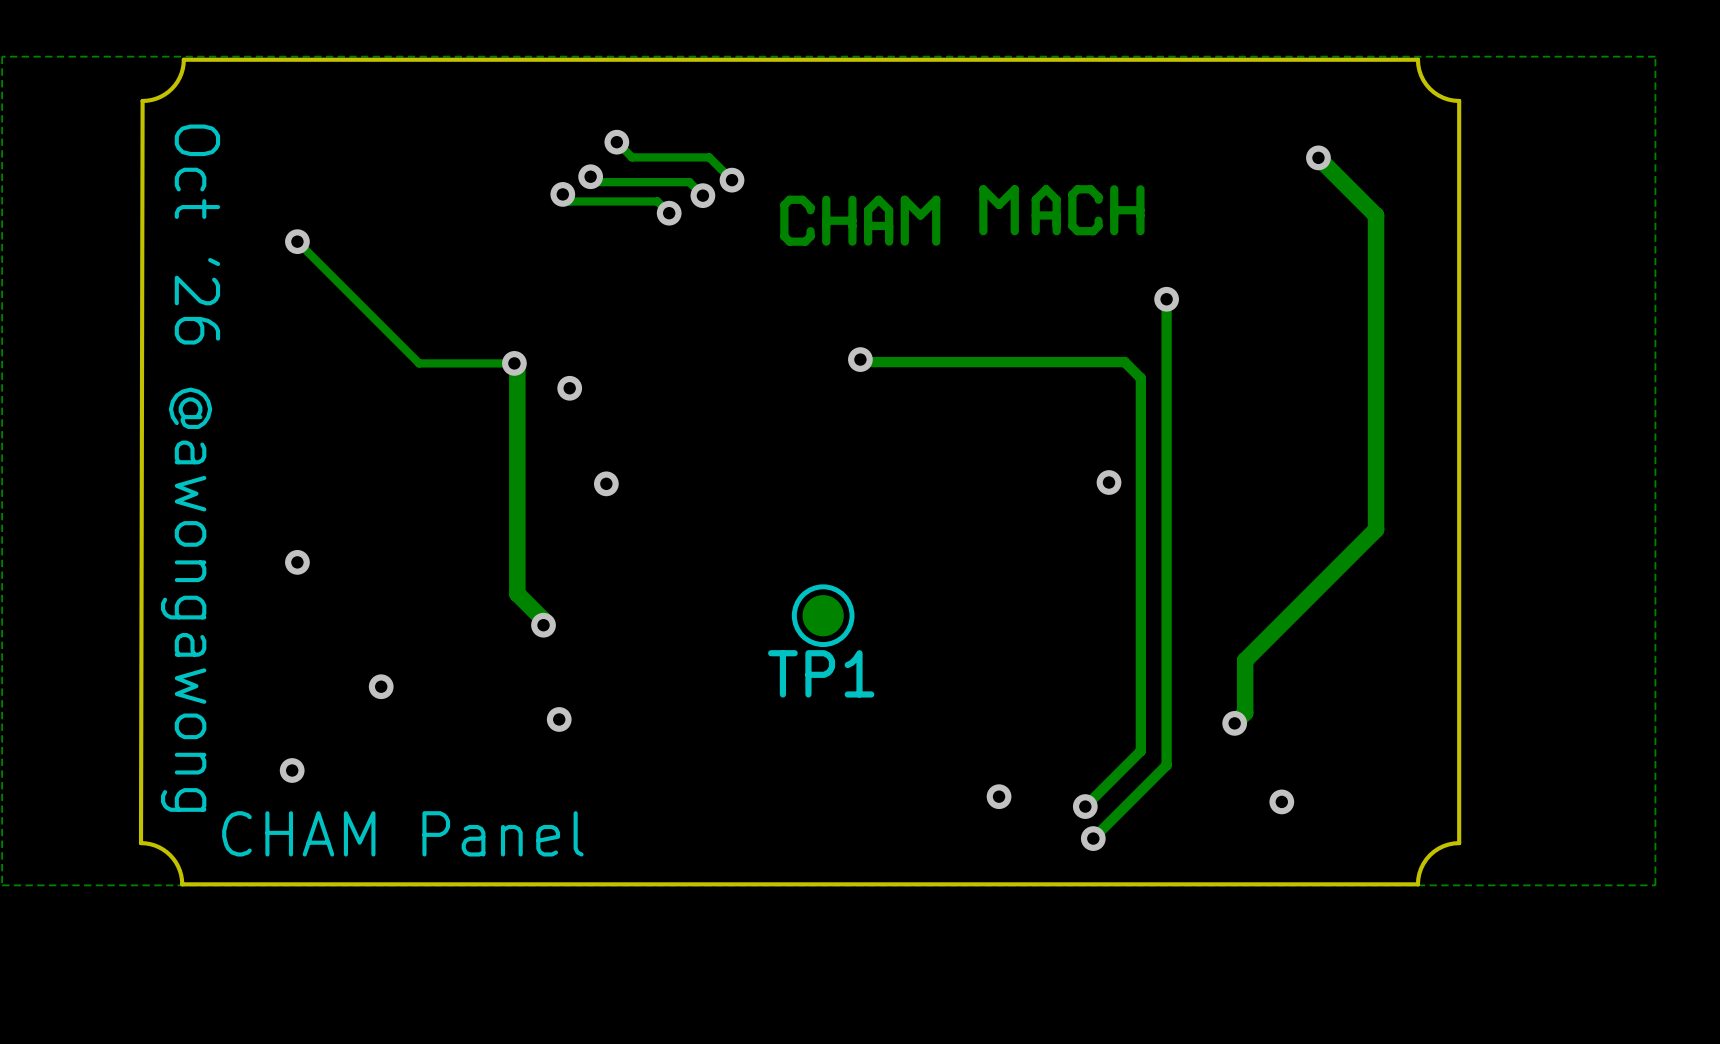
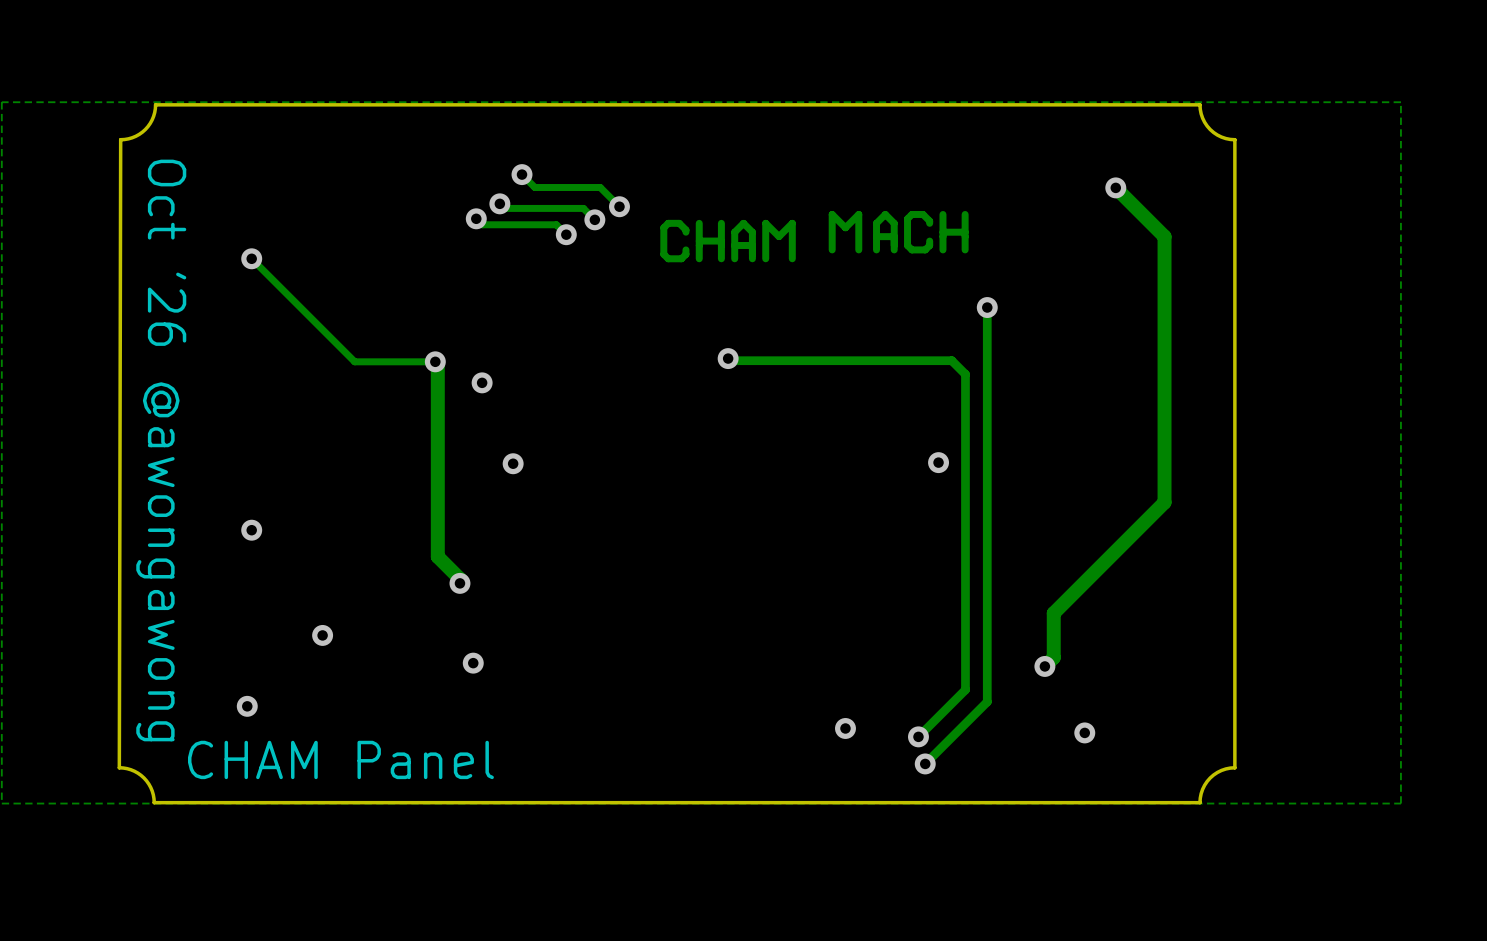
TP1: (823, 615) -> none

